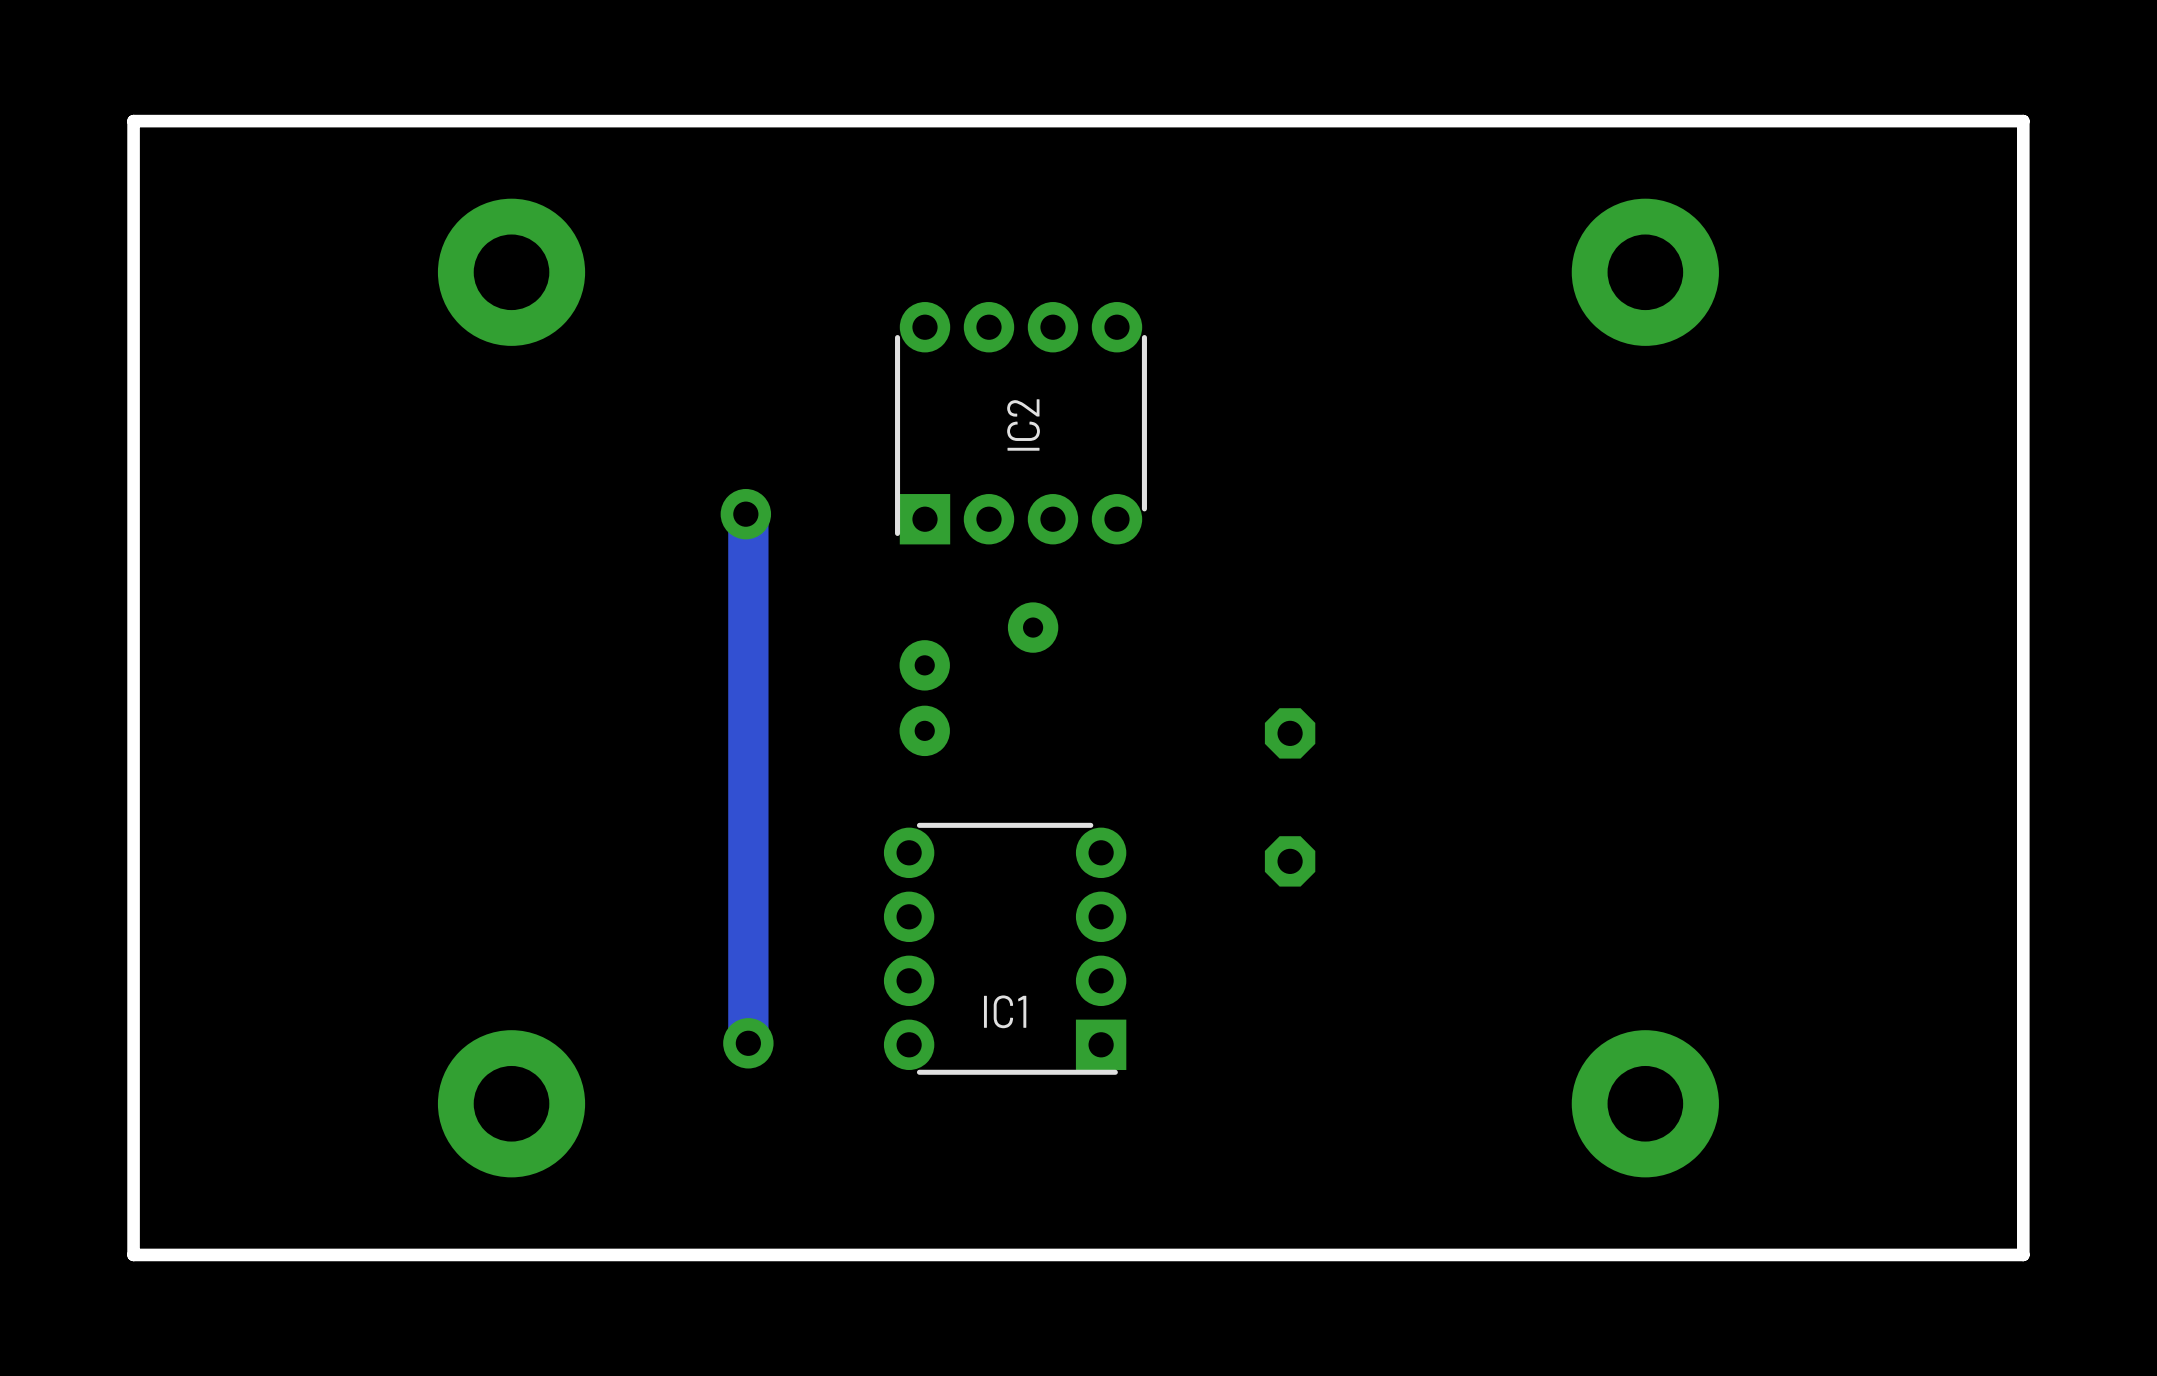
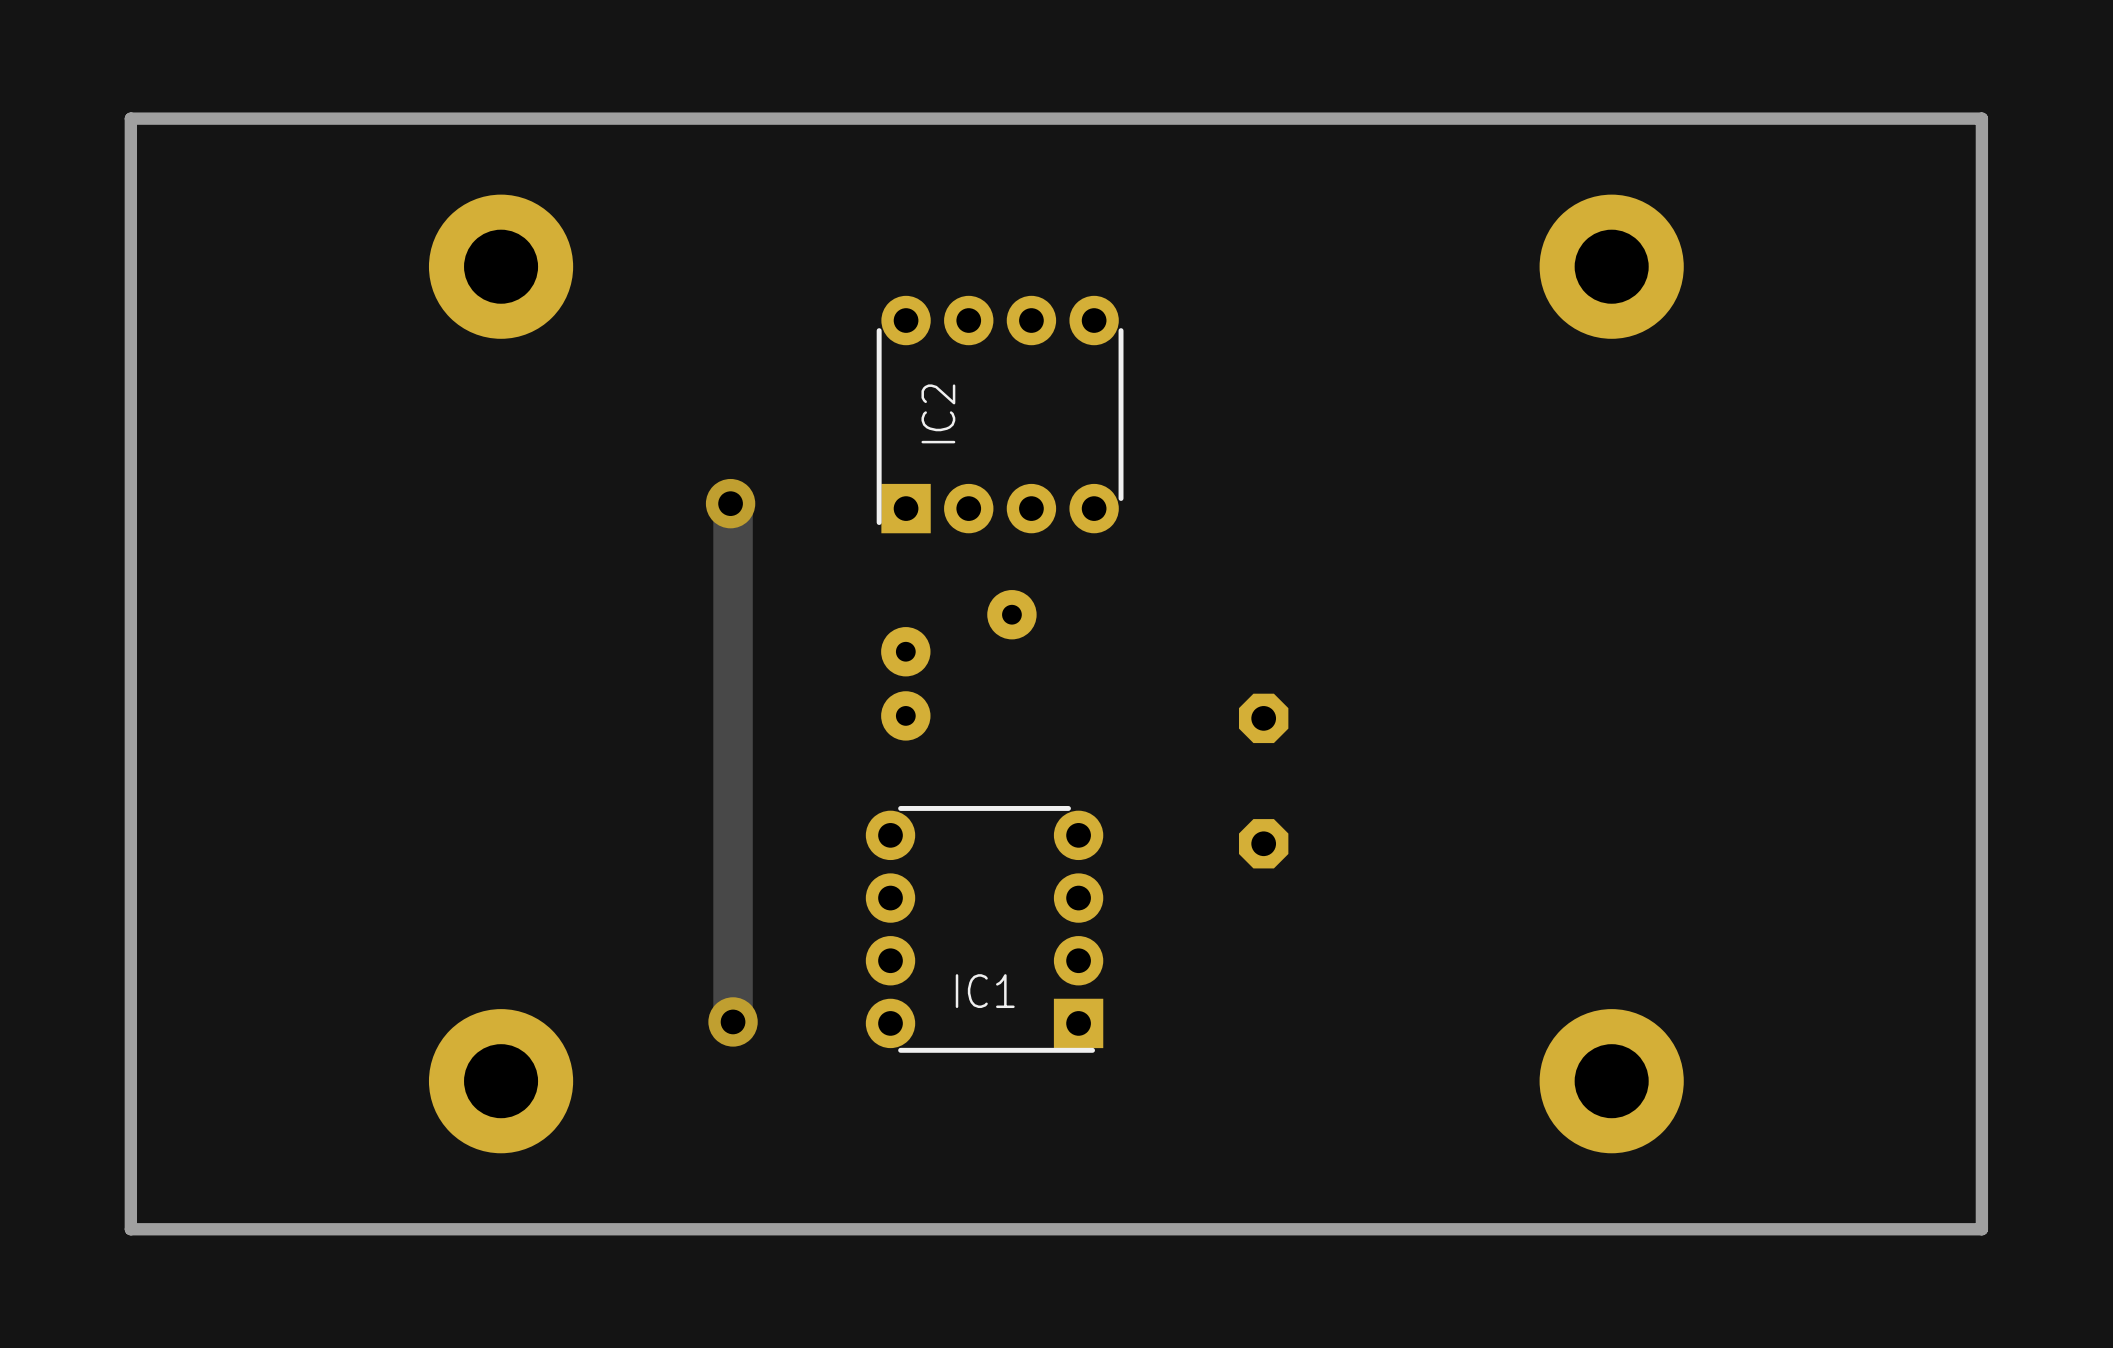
IC2 name position: IC2 (1023, 424) -> IC2 (938, 413)

